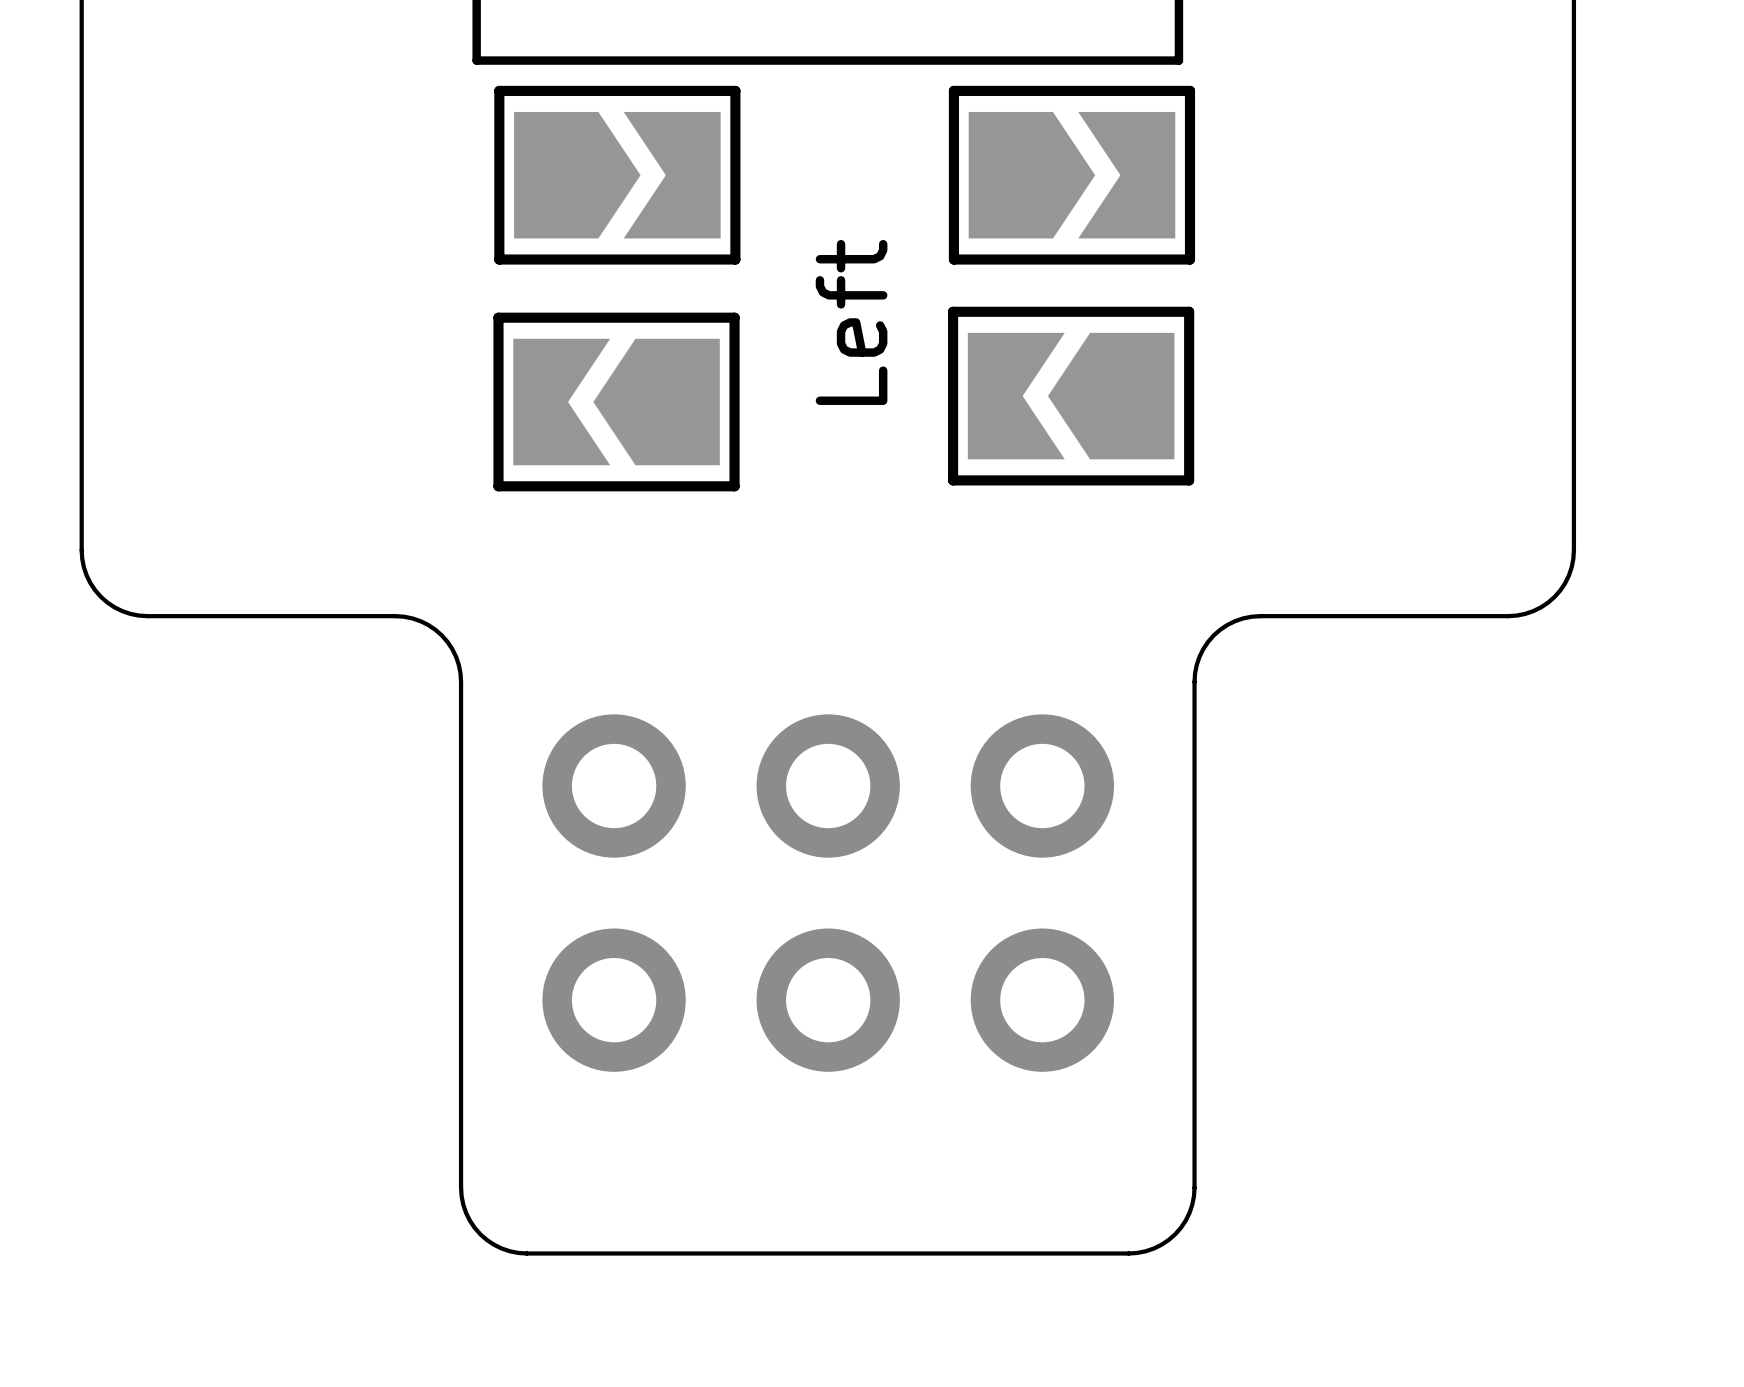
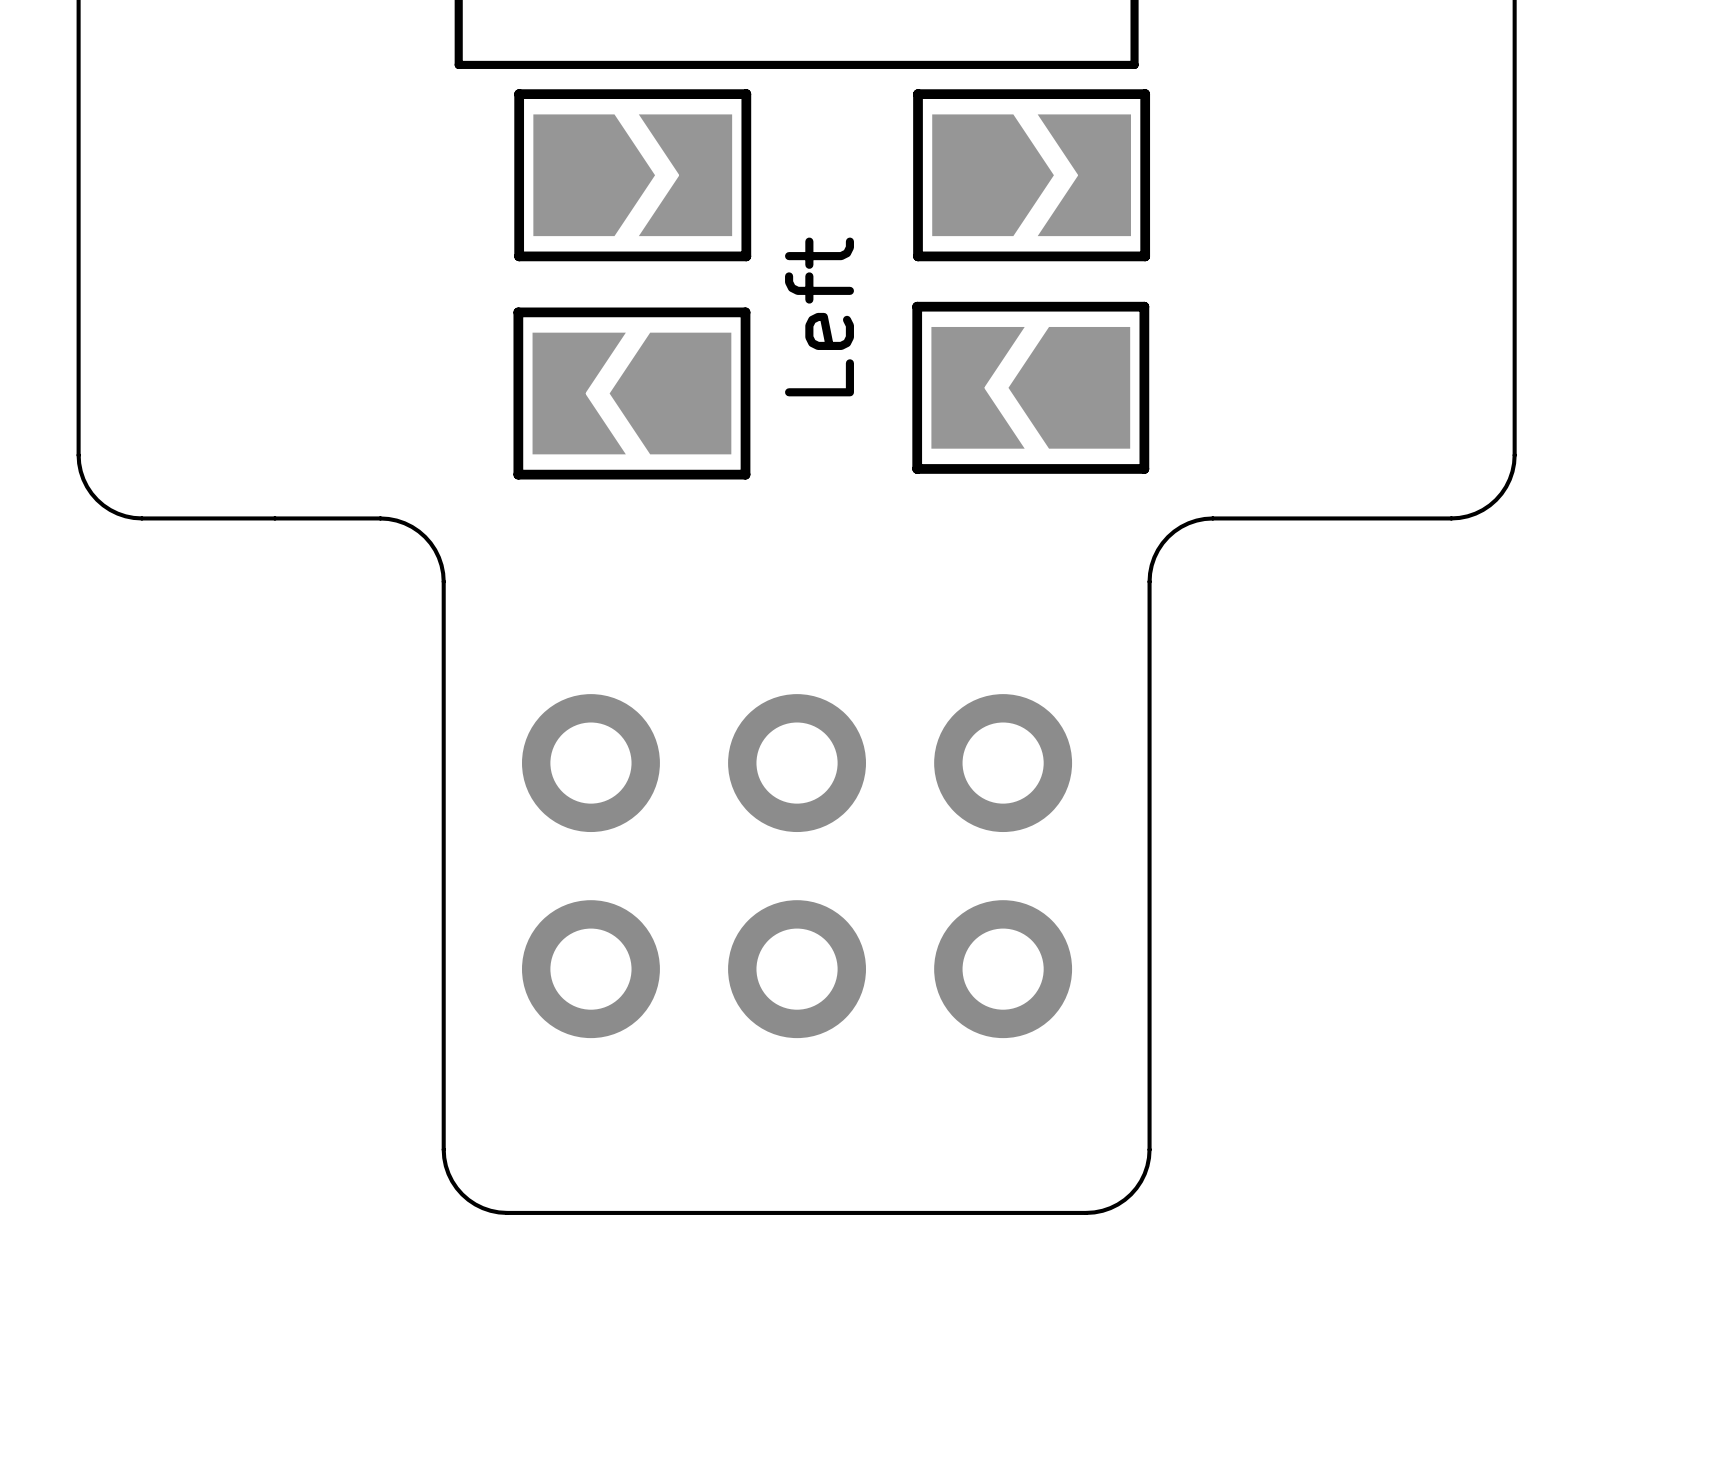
part position: (617, 175) -> (632, 175)
part position: (616, 402) -> (631, 393)
board edge: (81, 466) (81, 550) (83, 567) (95, 590) (114, 607) (130, 613) (147, 616) (395, 616) (412, 618) (428, 624) (447, 641) (456, 656) (461, 681) -> (78, 455) (83, 479) (91, 493) (110, 509) (125, 516) (141, 518) (380, 518) (396, 520) (412, 526) (430, 543) (441, 565) (443, 581) (443, 662)
board edge: (1573, 466) (1573, 550) (1571, 567) (1560, 590) (1541, 607) (1525, 613) (1508, 616) (1260, 616) (1243, 618) (1220, 629) (1208, 641) (1199, 656) (1194, 681) -> (1514, 455) (1512, 471) (1501, 493) (1489, 505) (1467, 516) (1451, 518) (1212, 518) (1196, 520) (1181, 526) (1162, 543) (1151, 565) (1149, 581) (1149, 662)

